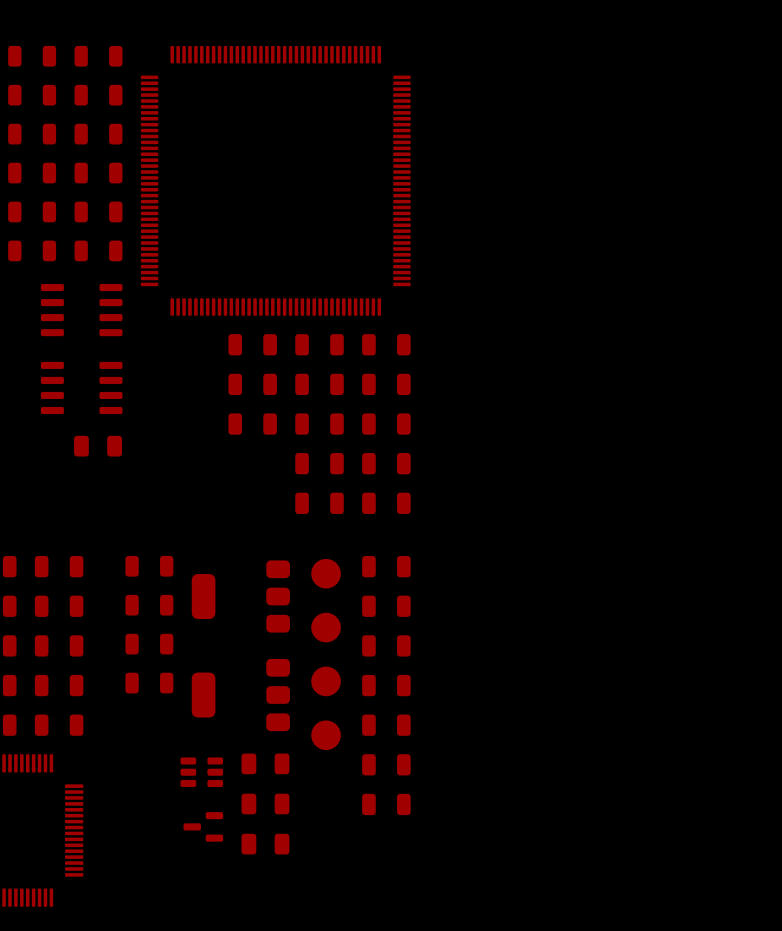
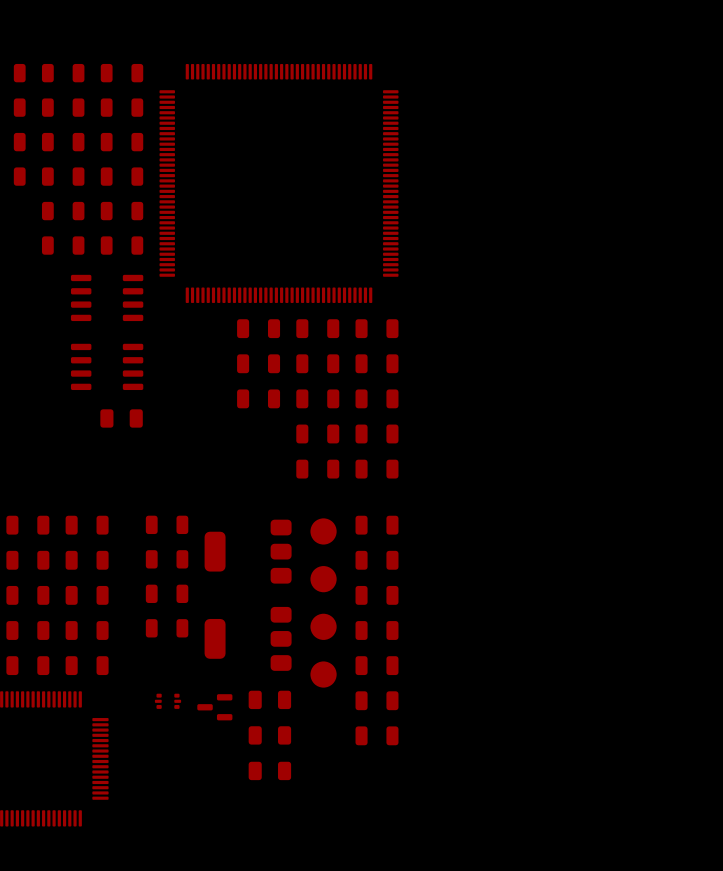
part footprint: [180, 757, 224, 788] -> [197, 694, 233, 721]
part: none -> (168, 701)
part: (203, 826) -> none

